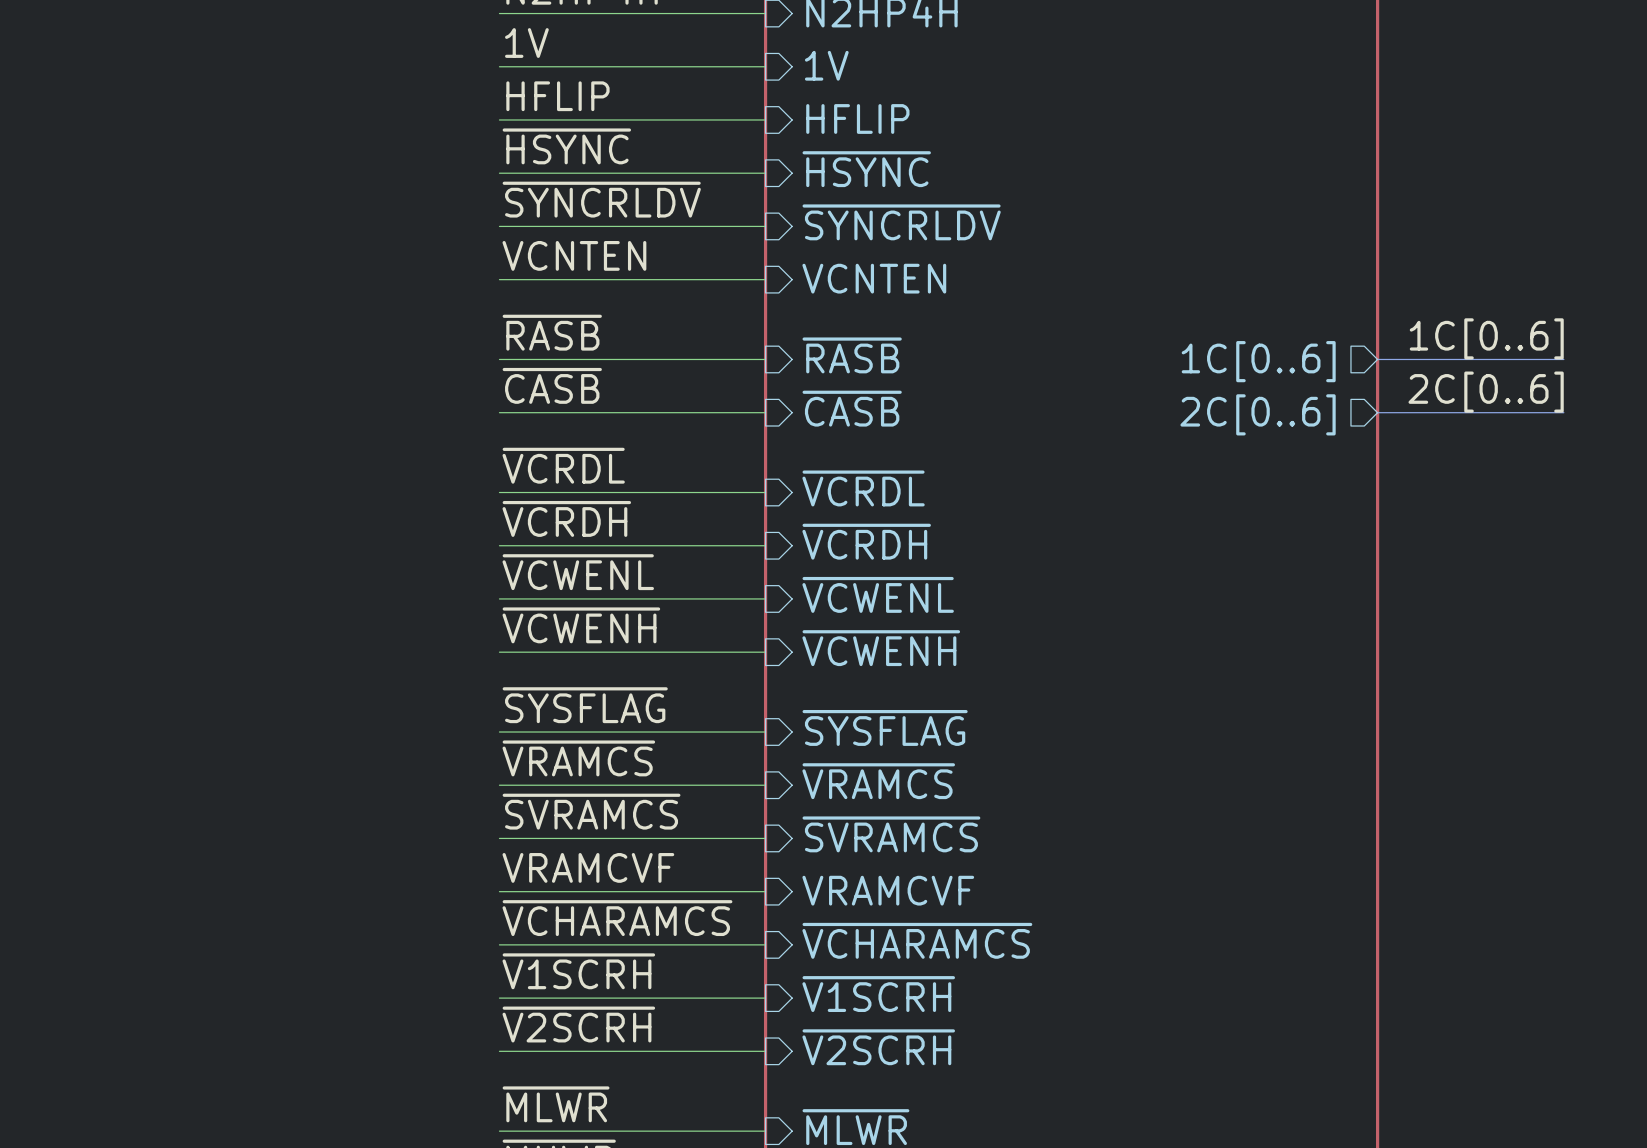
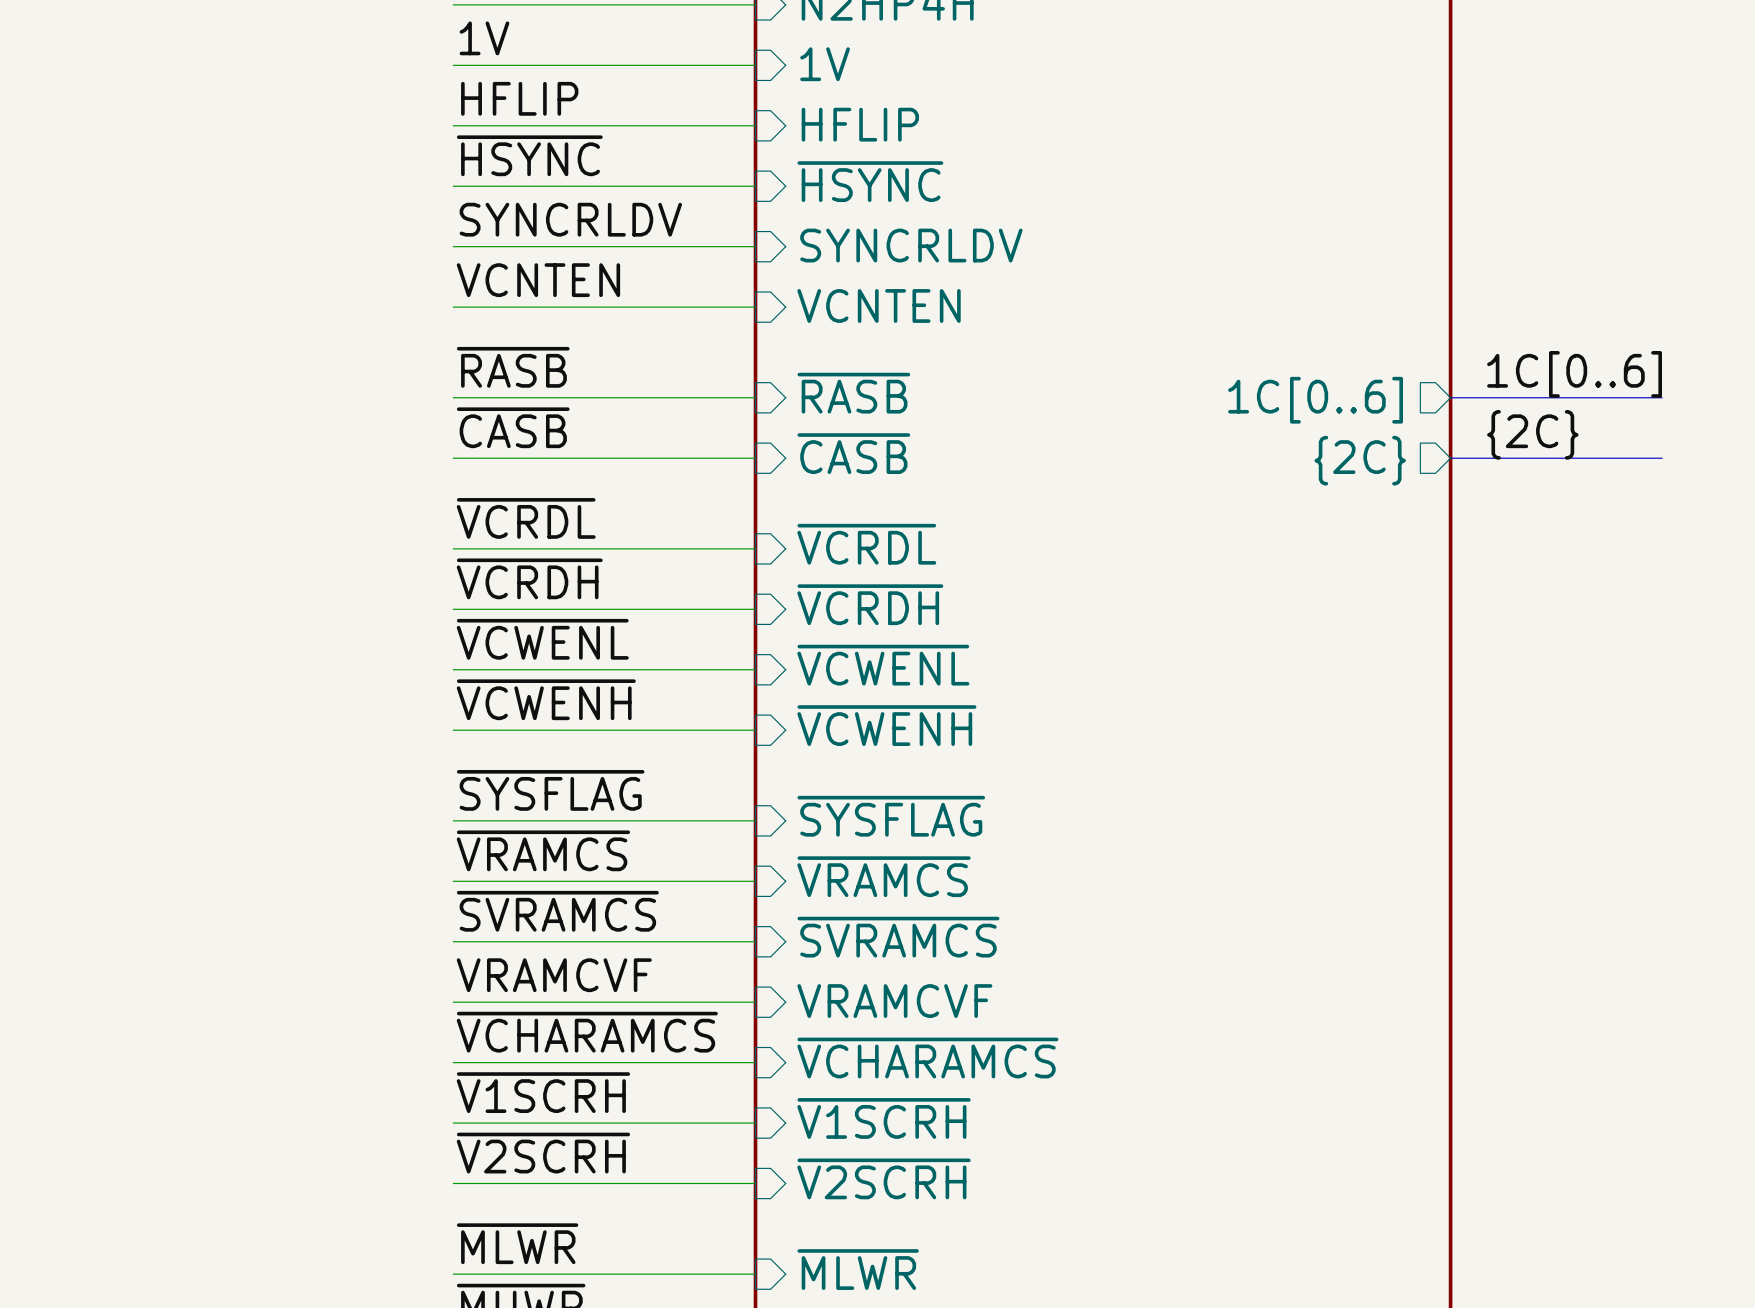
label: ~{SYNCRLDV} (601, 199) -> SYNCRLDV (570, 219)
sheet pin: ~{SYNCRLDV} (901, 222) -> SYNCRLDV (911, 245)
label: 2C[0..6] (1486, 392) -> {2C} (1532, 434)
sheet pin: 2C[0..6] (1258, 414) -> {2C} (1360, 460)

